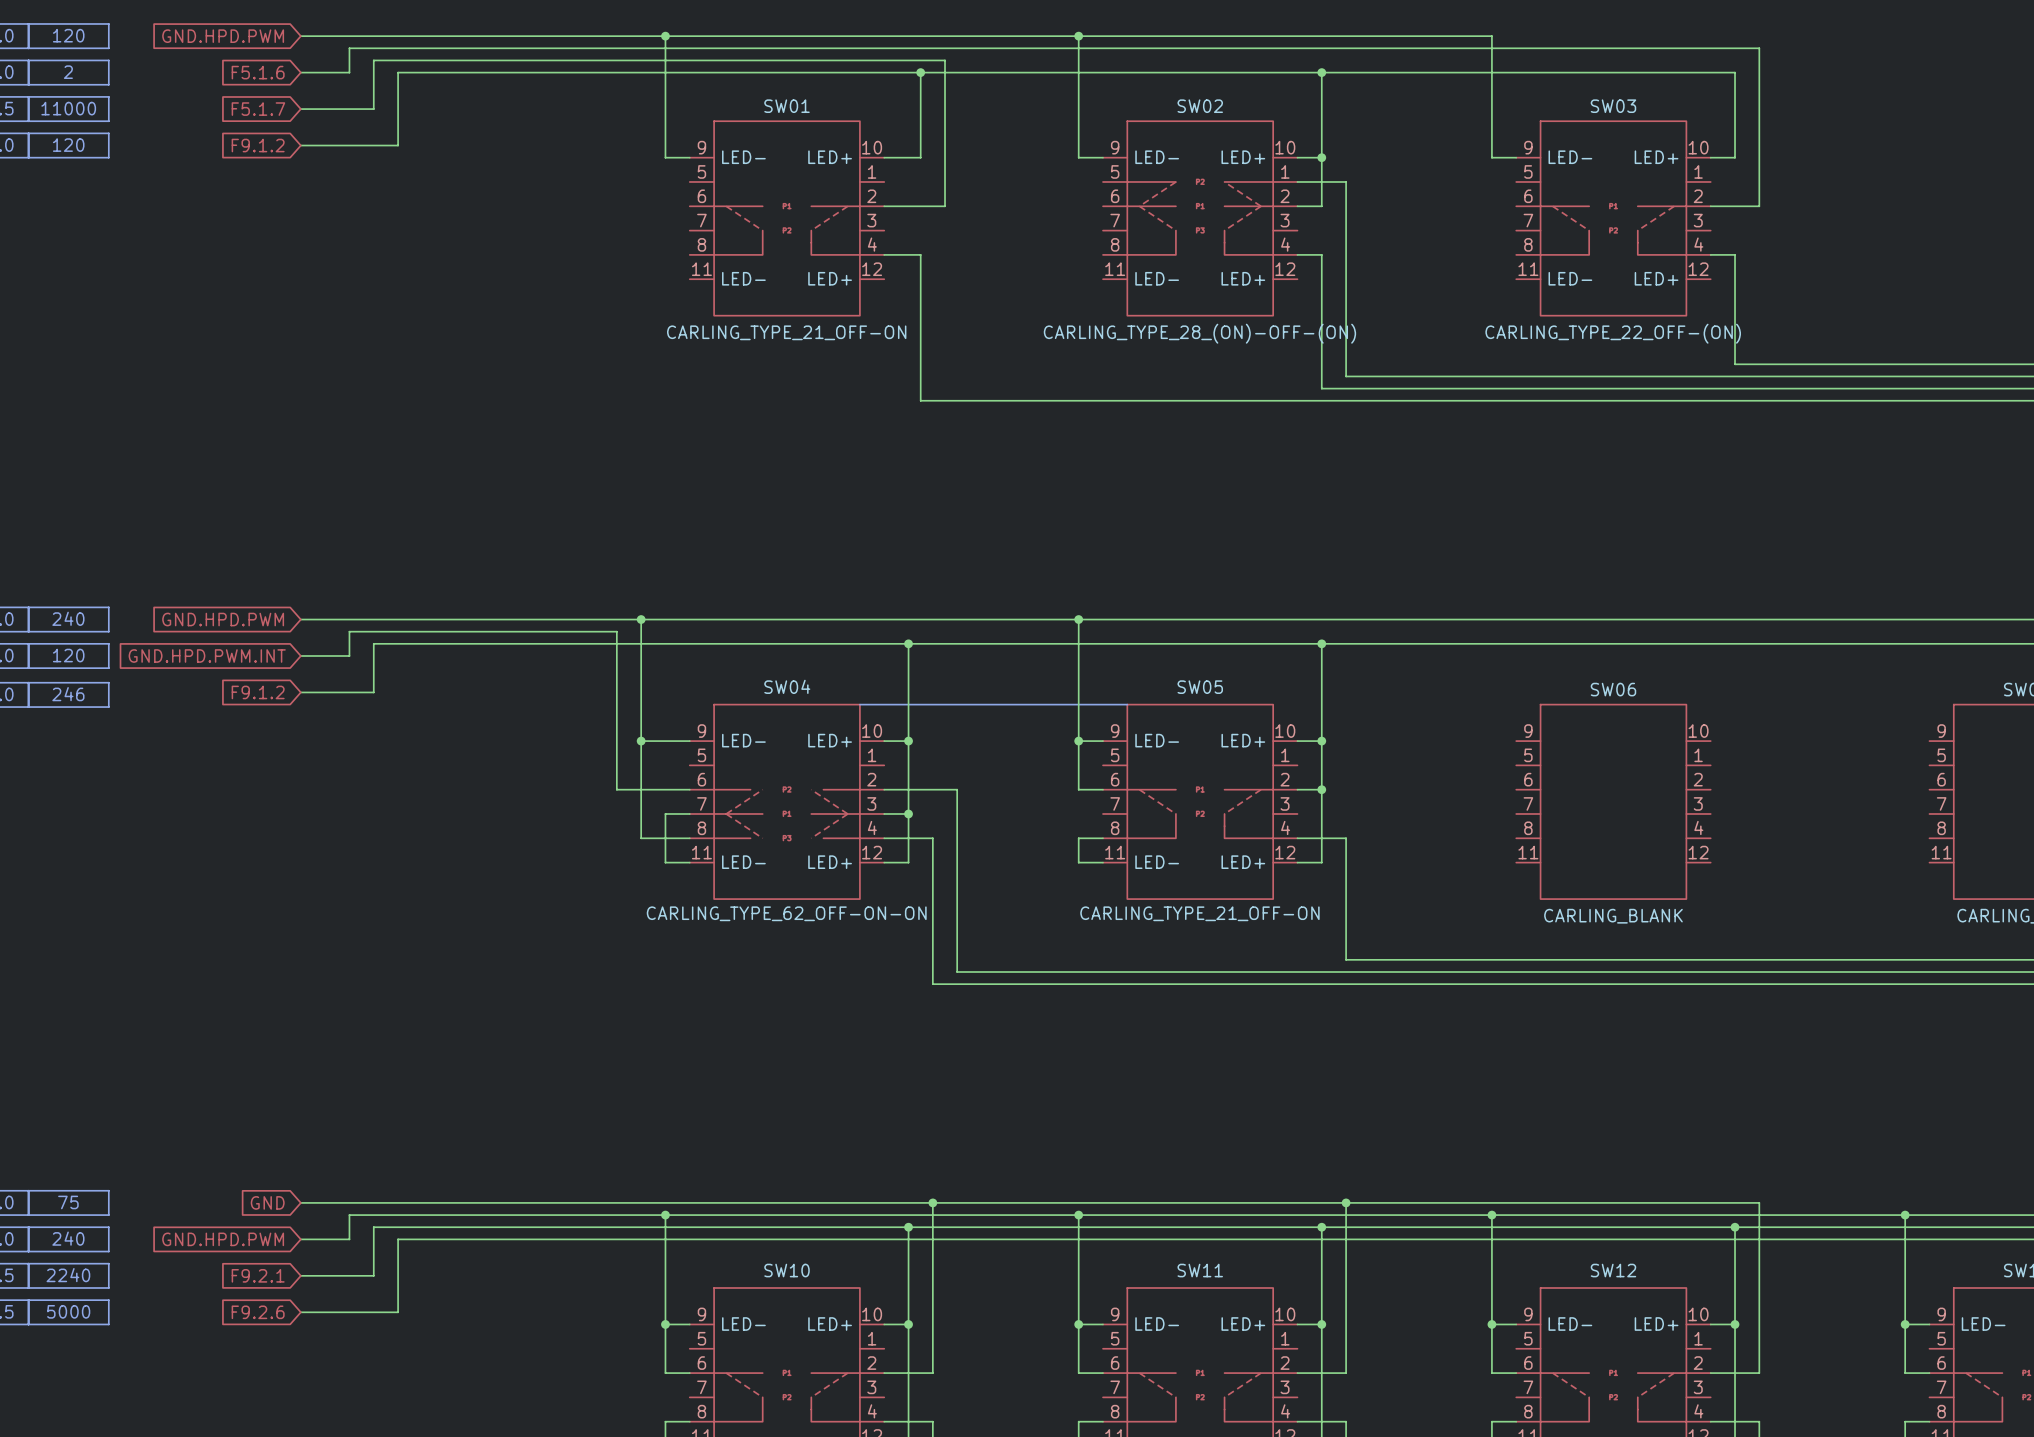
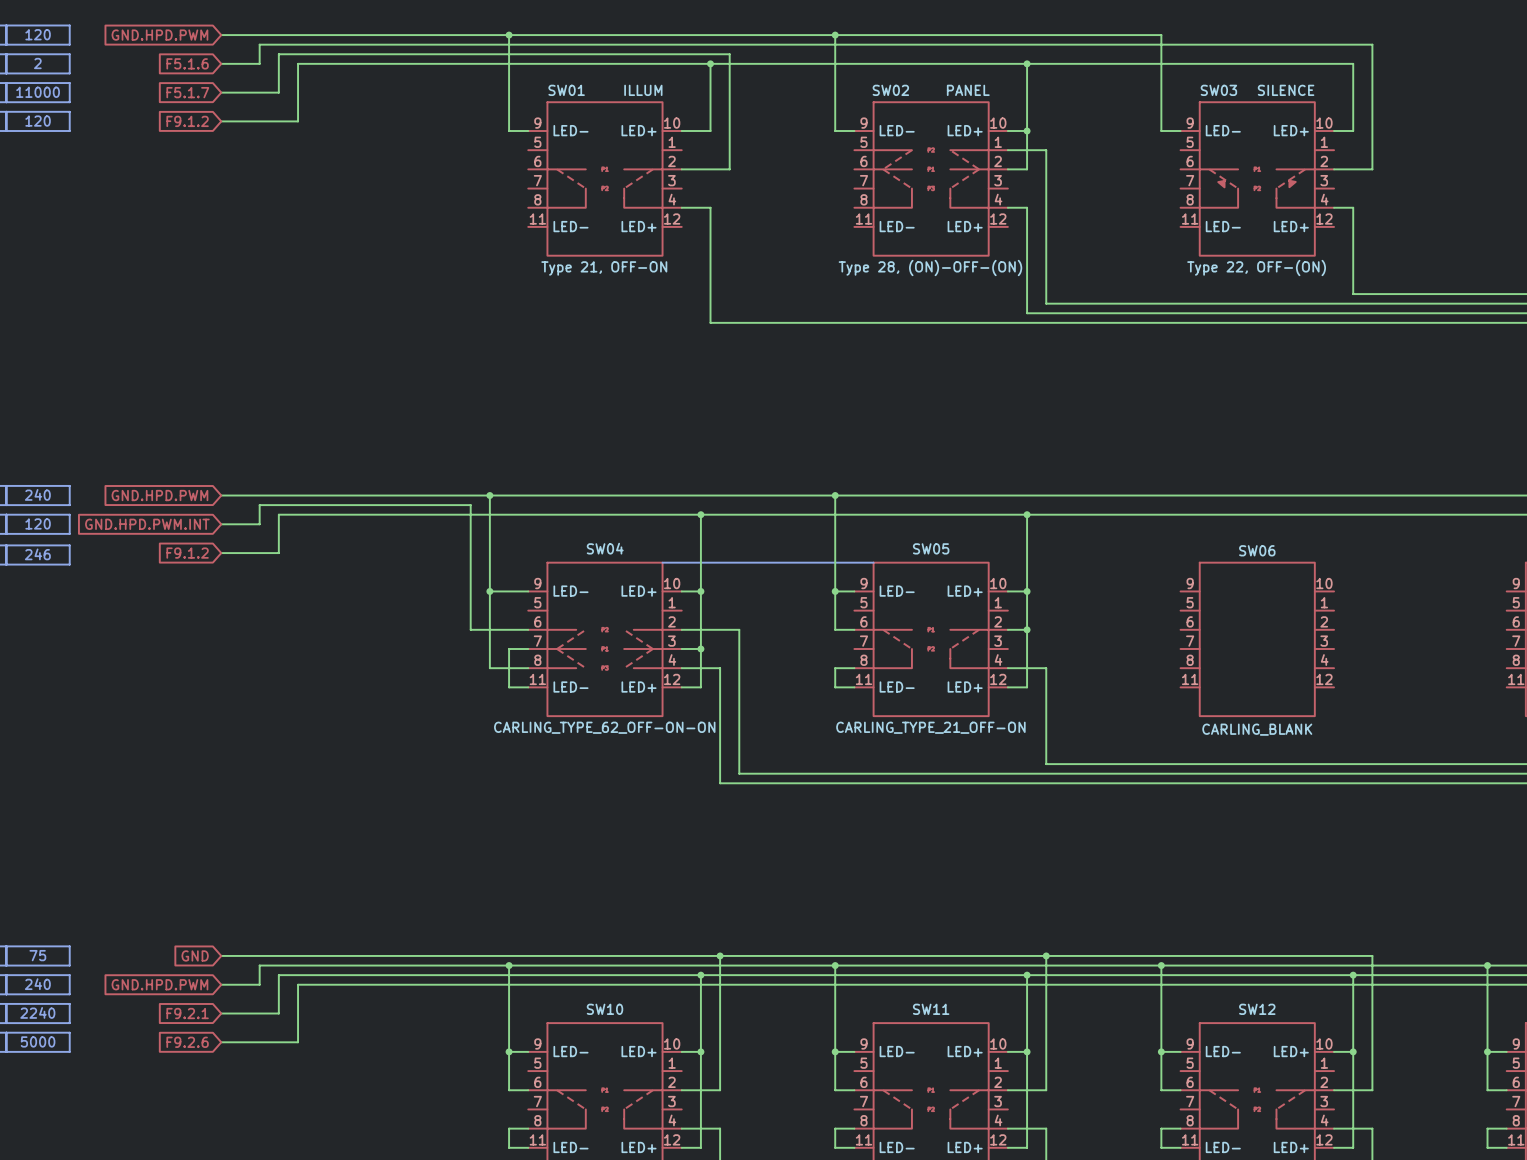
SW01 name position: SW01 (787, 106) -> SW01 (566, 90)
SW02 name position: SW02 (1200, 106) -> SW02 (890, 90)
SW03 name position: SW03 (1613, 106) -> SW03 (1218, 90)
SW03 symbol: [1516, 121, 1711, 316] -> [1180, 102, 1335, 256]
SW01 text: none -> Type 21, OFF-ON (604, 268)
SW02 text: none -> Type 28, (ON)-OFF-(ON) (930, 268)
SW03 text: none -> Type 22, OFF-(ON) (1256, 268)
SW01 value: CARLING_TYPE_21_OFF-ON (786, 332) -> ILLUM (643, 90)
SW02 value: CARLING_TYPE_28_(ON)-OFF-(ON) (1199, 333) -> PANEL (968, 90)
SW03 value: CARLING_TYPE_22_OFF-(ON) (1613, 333) -> SILENCE (1286, 90)

